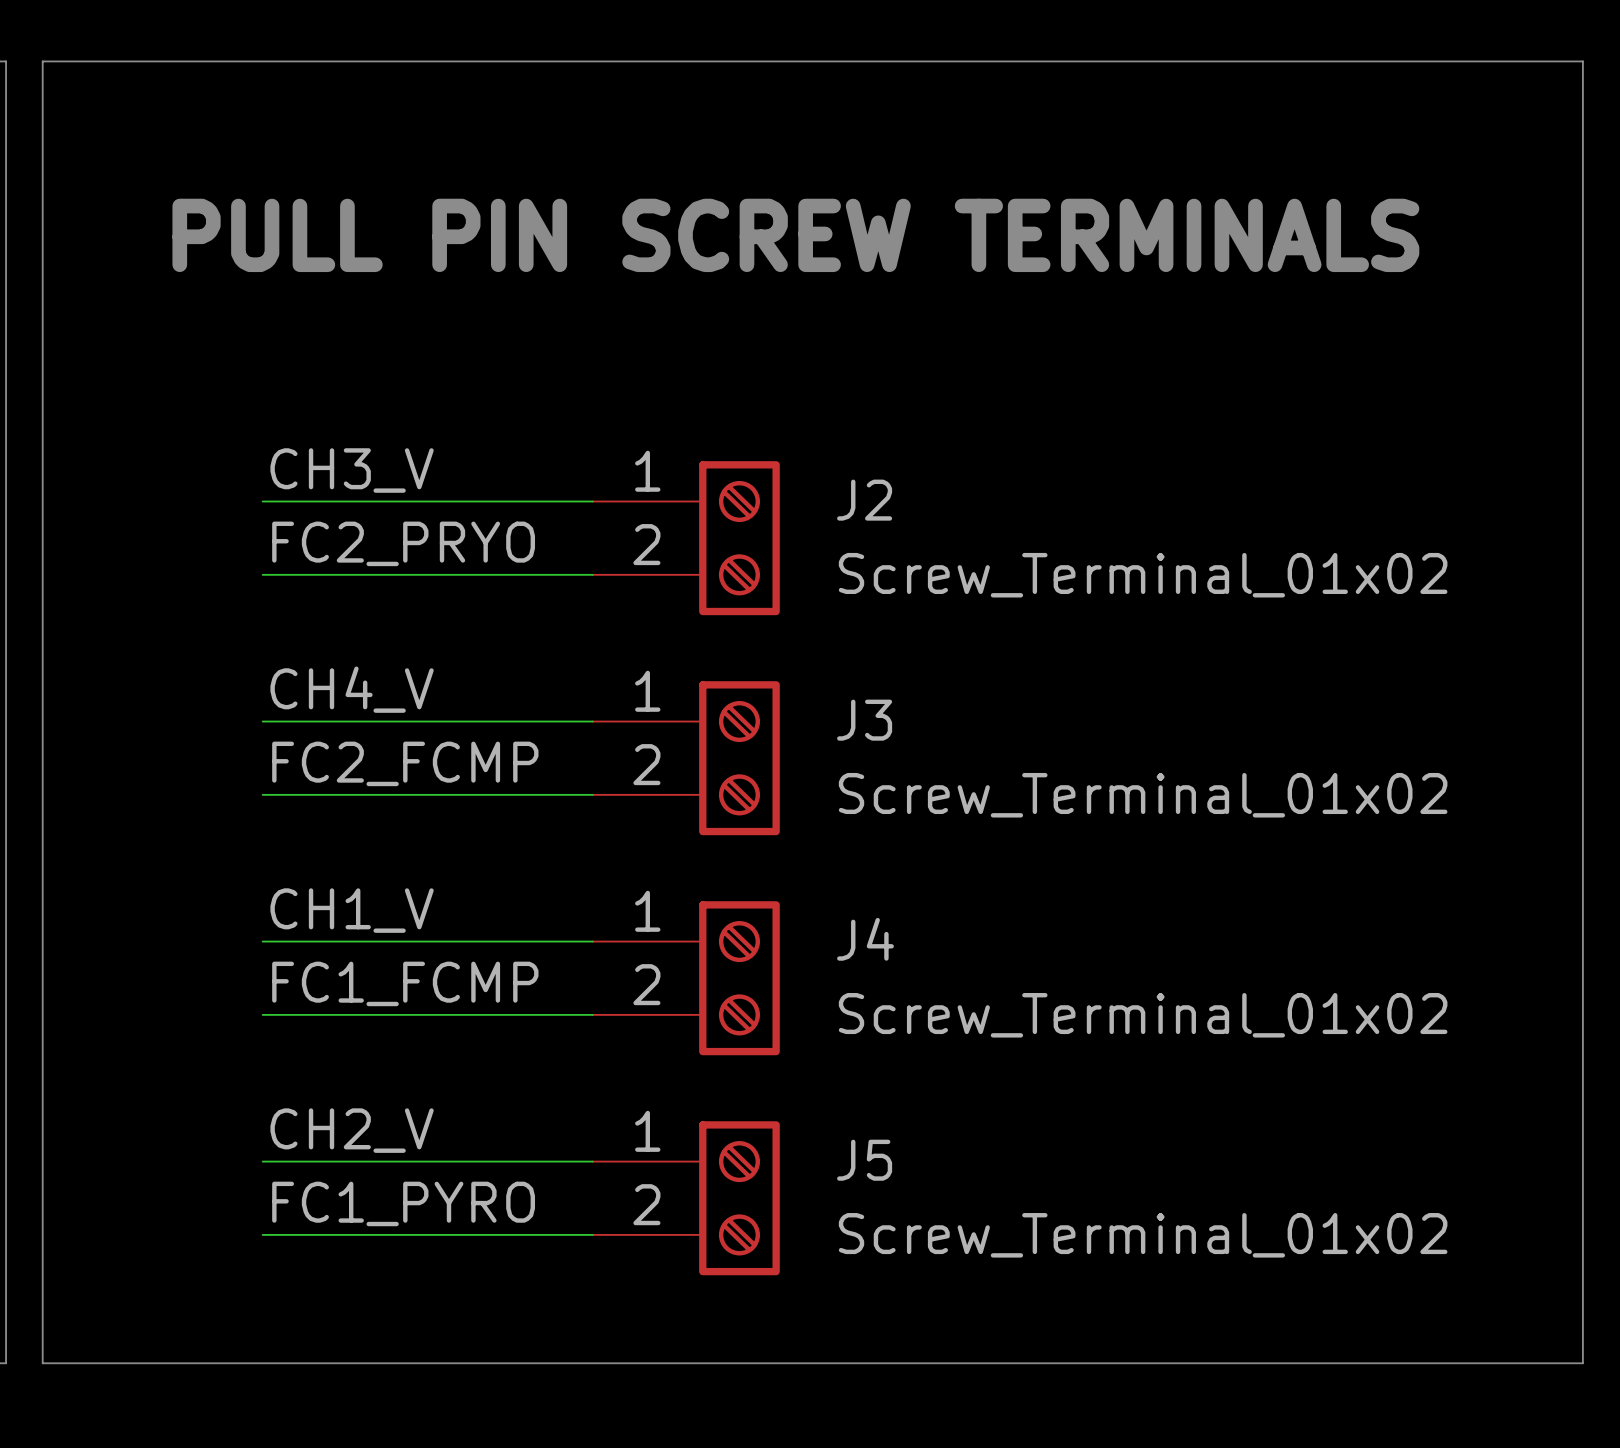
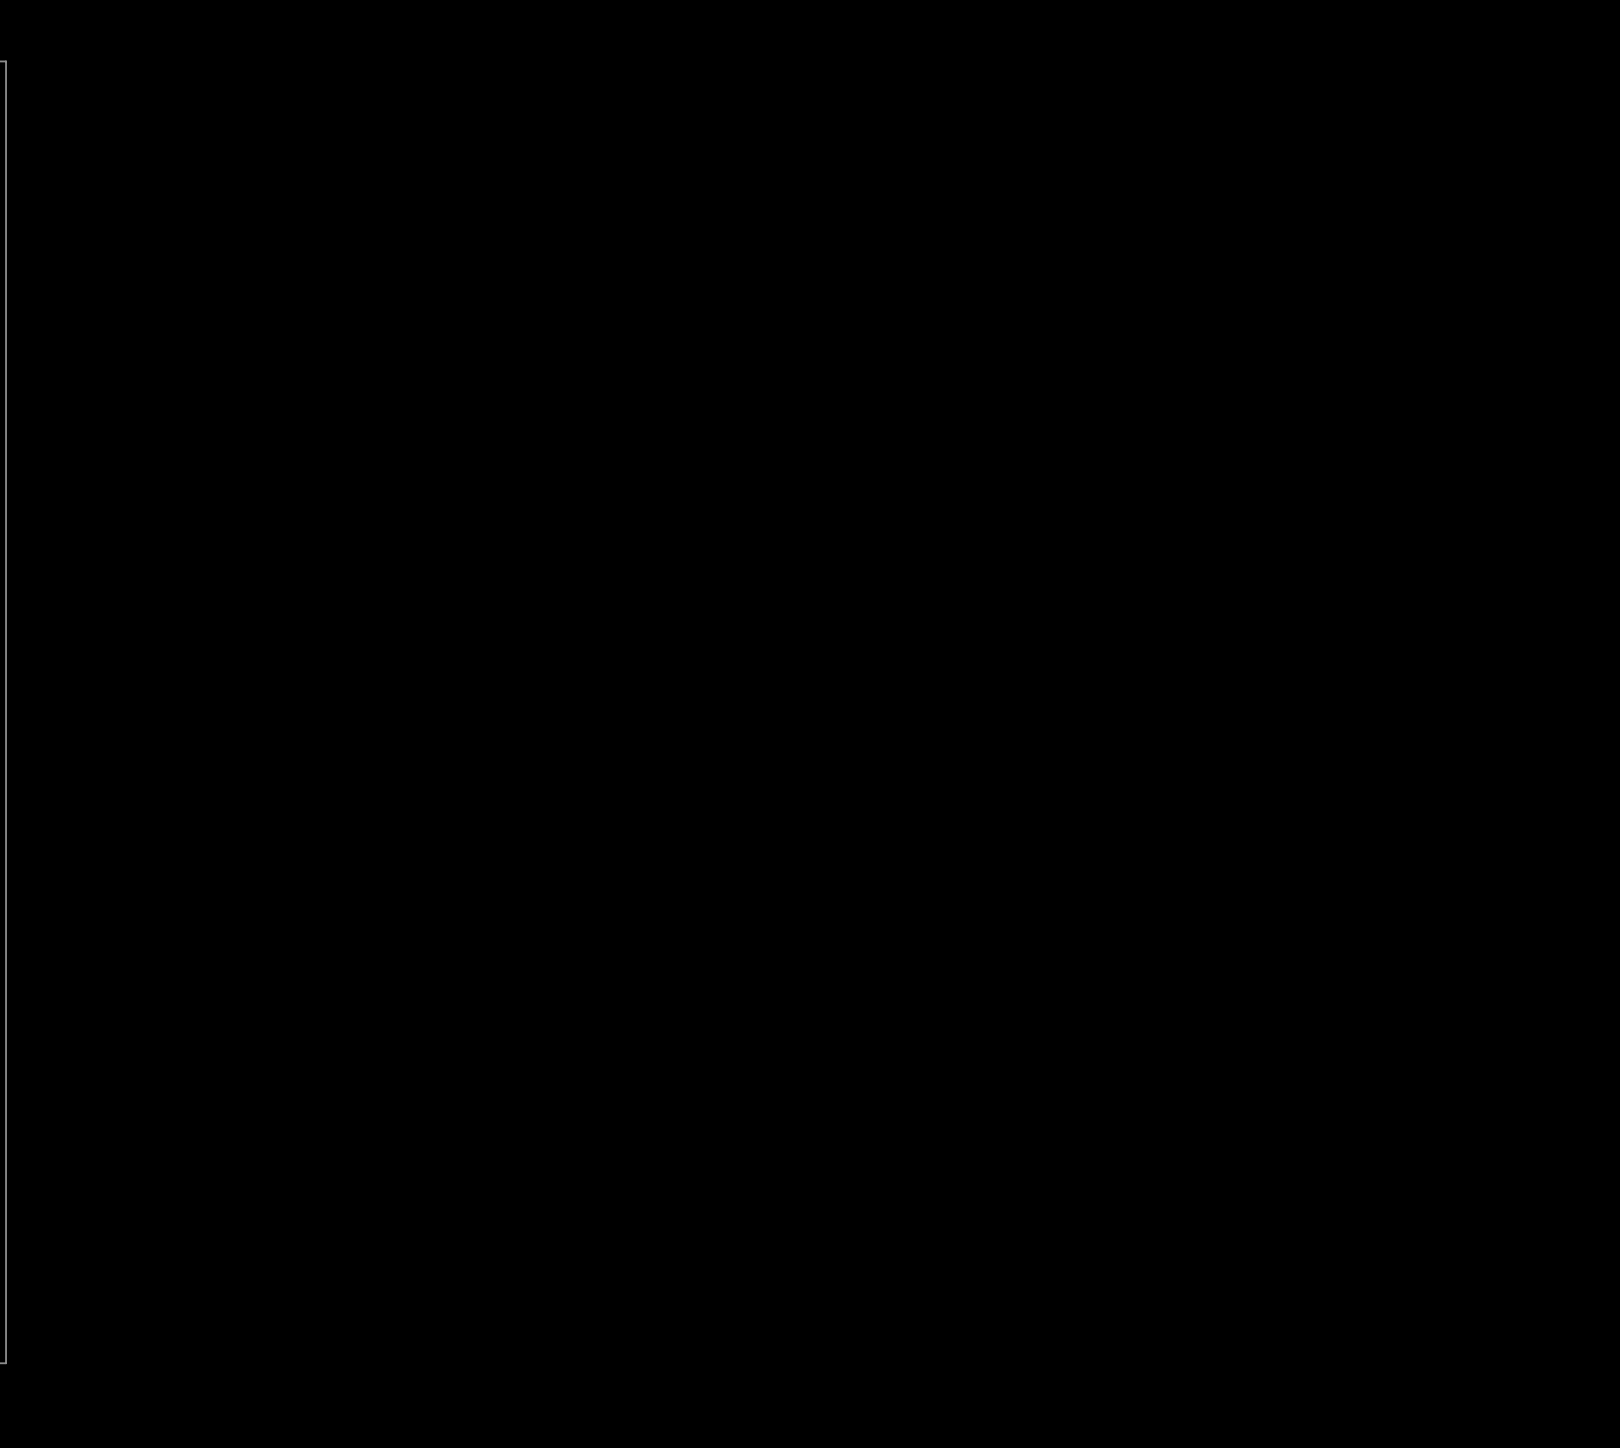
line: (42, 61) (1582, 61) (1582, 1363) (42, 1363) (42, 61) -> none
text: PULL PIN SCREW TERMINALS (795, 235) -> none
label: CH3_V (352, 470) -> none
wire: (262, 501) (592, 501) -> none
J2: Screw_Terminal_01x02 (686, 538) -> none
label: FC2_PRYO (403, 543) -> none
wire: (262, 574) (592, 574) -> none
label: CH4_V (352, 689) -> none
wire: (262, 721) (592, 721) -> none
J3: Screw_Terminal_01x02 (686, 758) -> none
label: FC2_FCMP (405, 763) -> none
wire: (262, 794) (592, 794) -> none
label: CH1_V (352, 910) -> none
wire: (262, 941) (592, 941) -> none
J4: Screw_Terminal_01x02 (686, 978) -> none
label: FC1_FCMP (405, 983) -> none
wire: (262, 1014) (592, 1014) -> none
label: CH2_V (352, 1130) -> none
wire: (262, 1161) (592, 1161) -> none
J5: Screw_Terminal_01x02 (686, 1198) -> none
label: FC1_PYRO (403, 1203) -> none
wire: (262, 1234) (592, 1234) -> none

